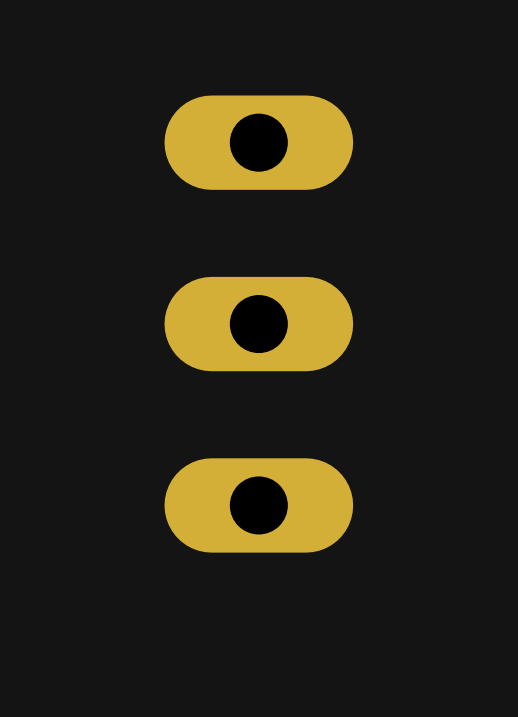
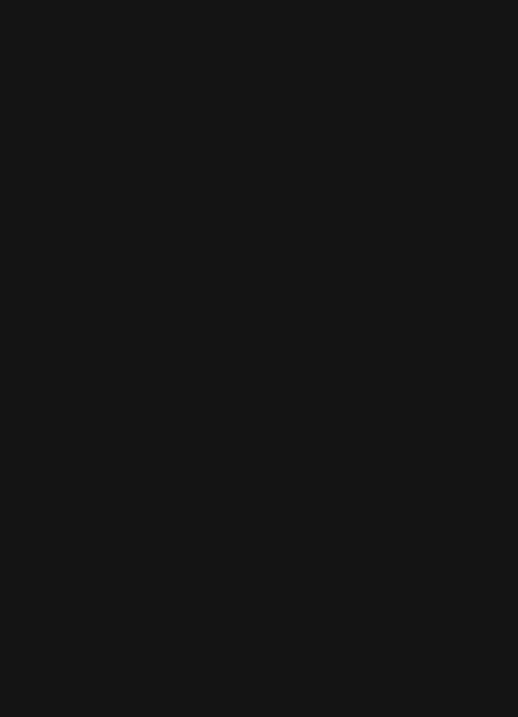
part: (258, 324) -> none

